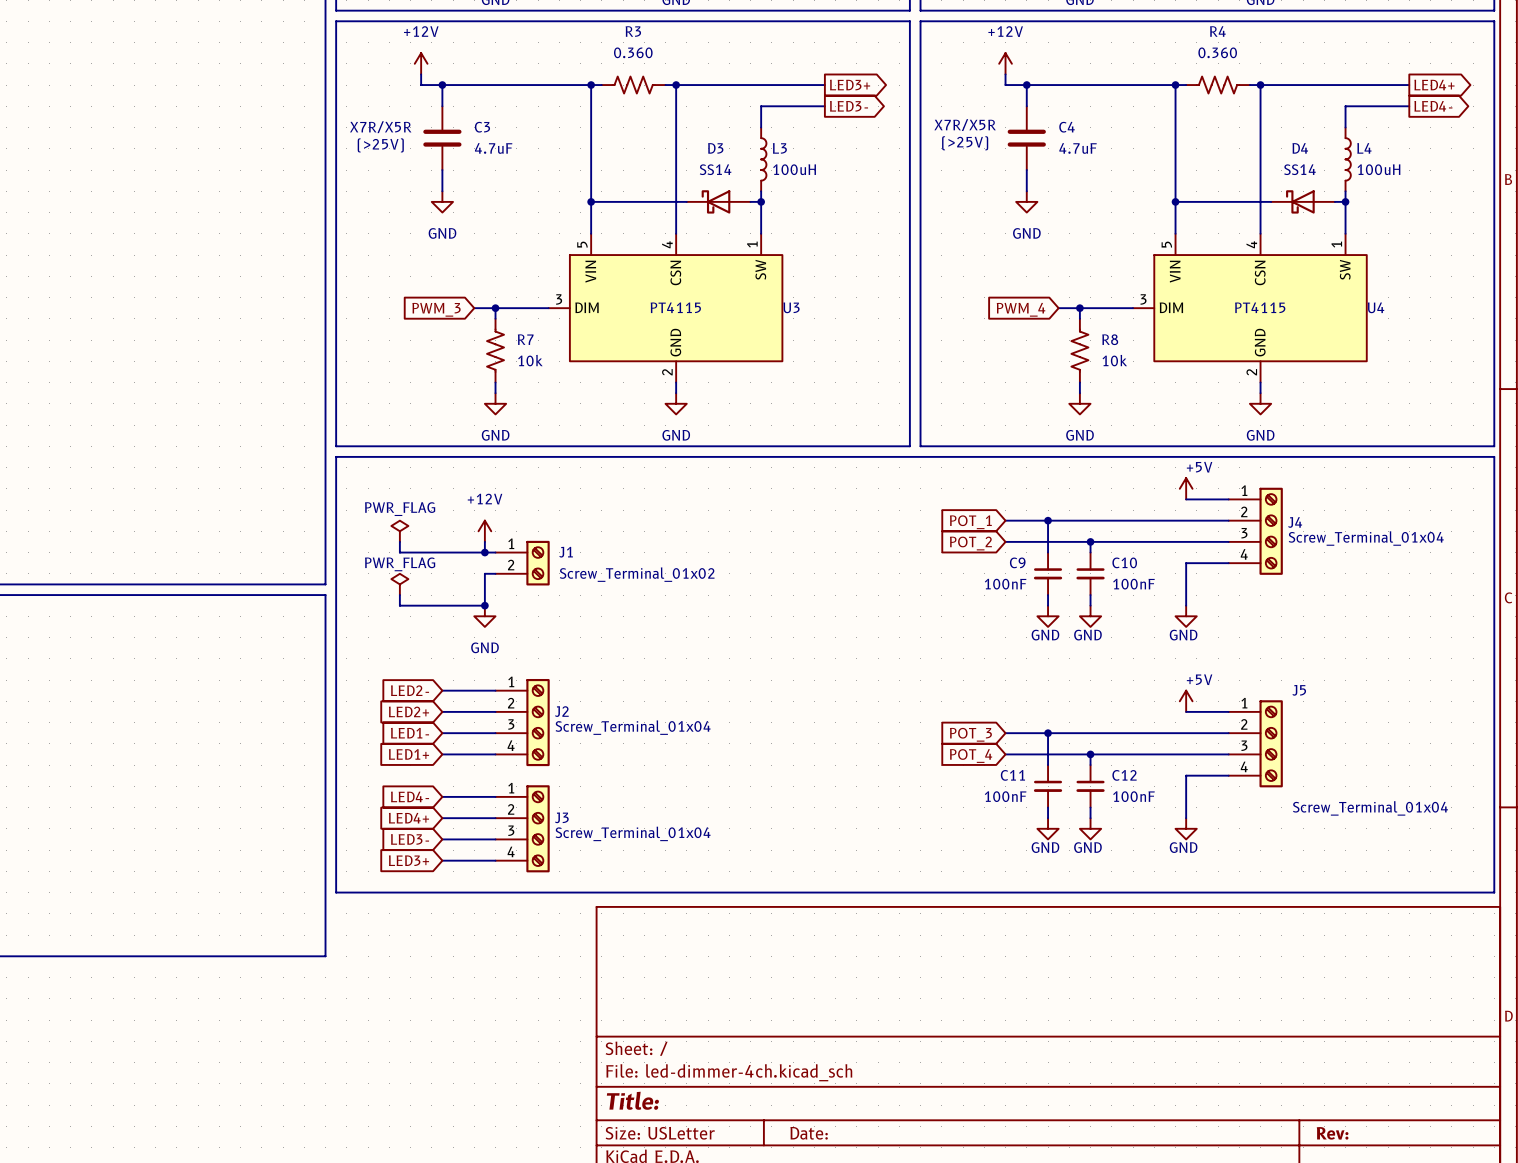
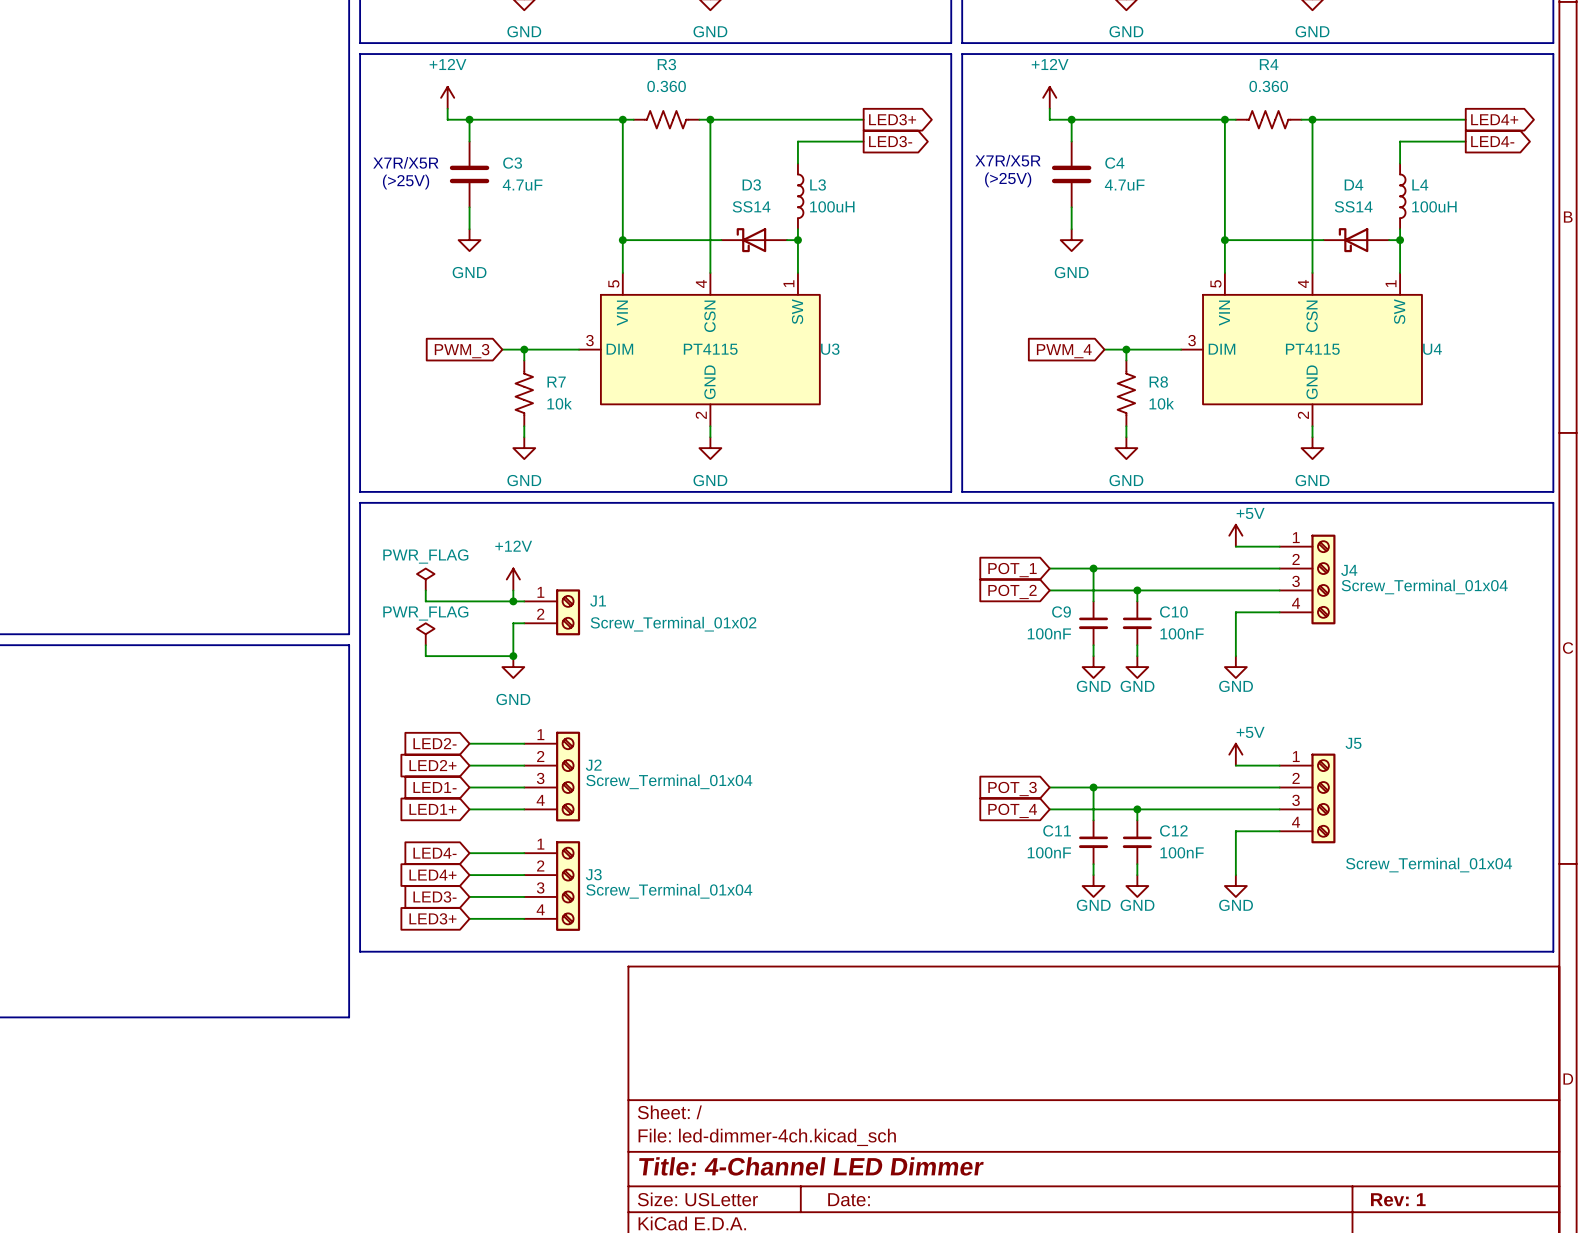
title block: Title: (632, 1100) -> Title: 4-Channel LED Dimmer (811, 1166)
title block: Rev: (1332, 1133) -> Rev: 1 (1398, 1199)

